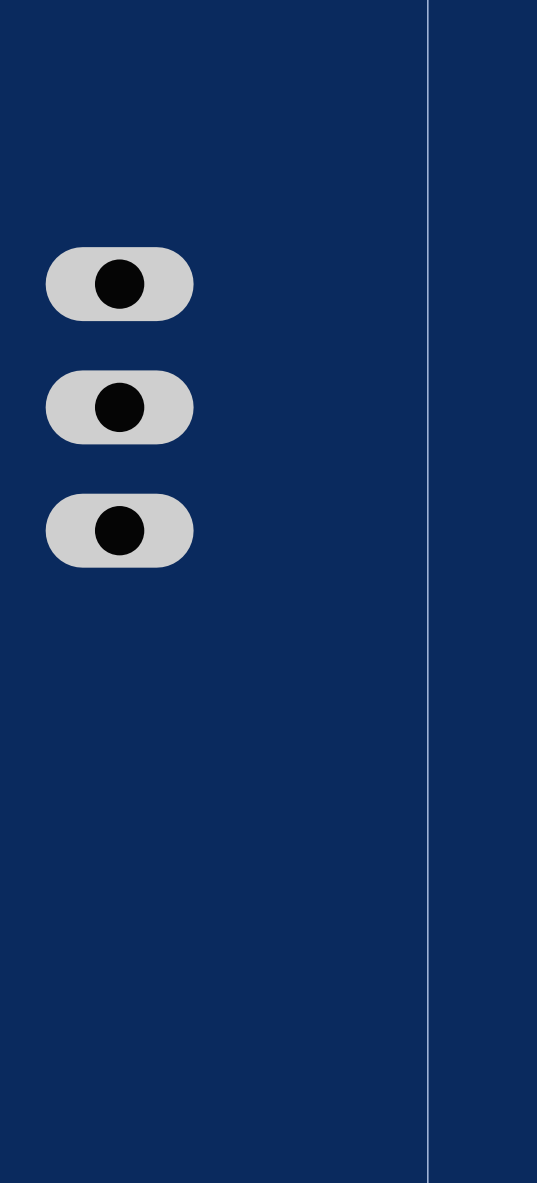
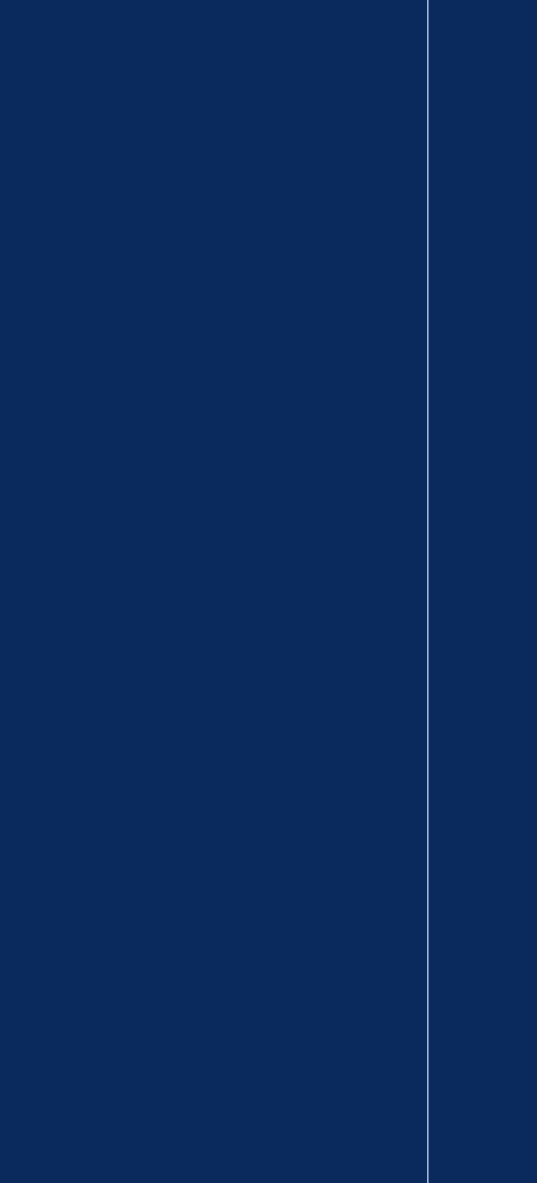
part: (119, 407) -> none

